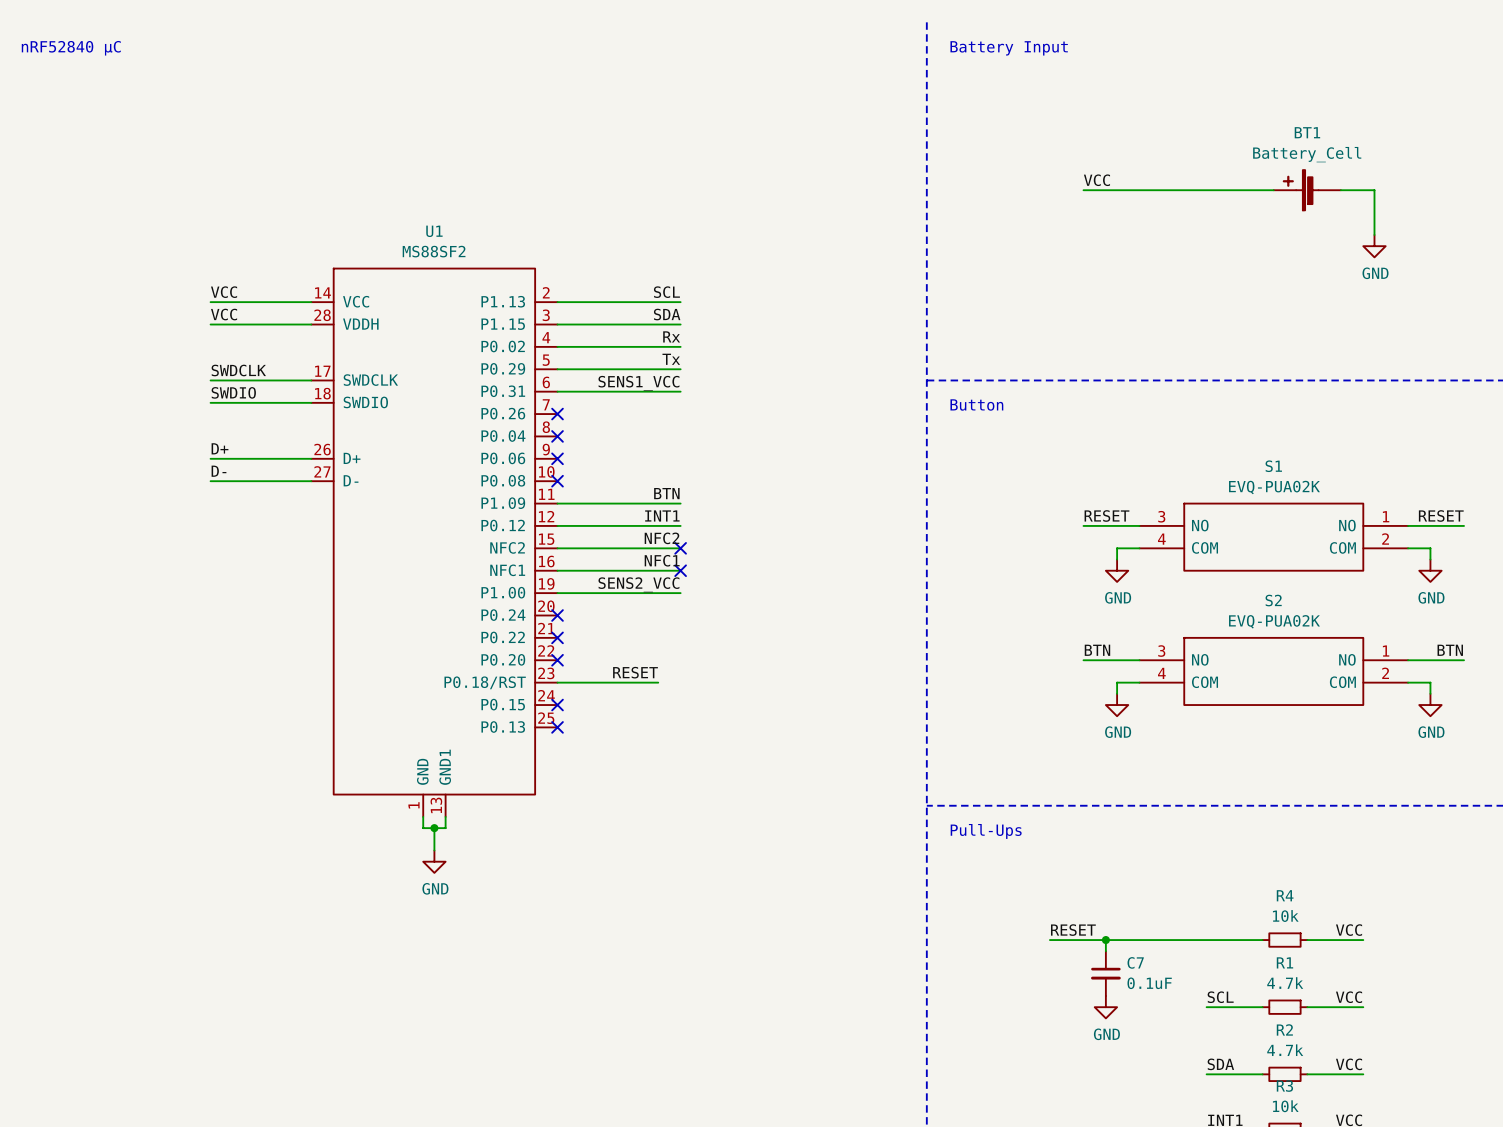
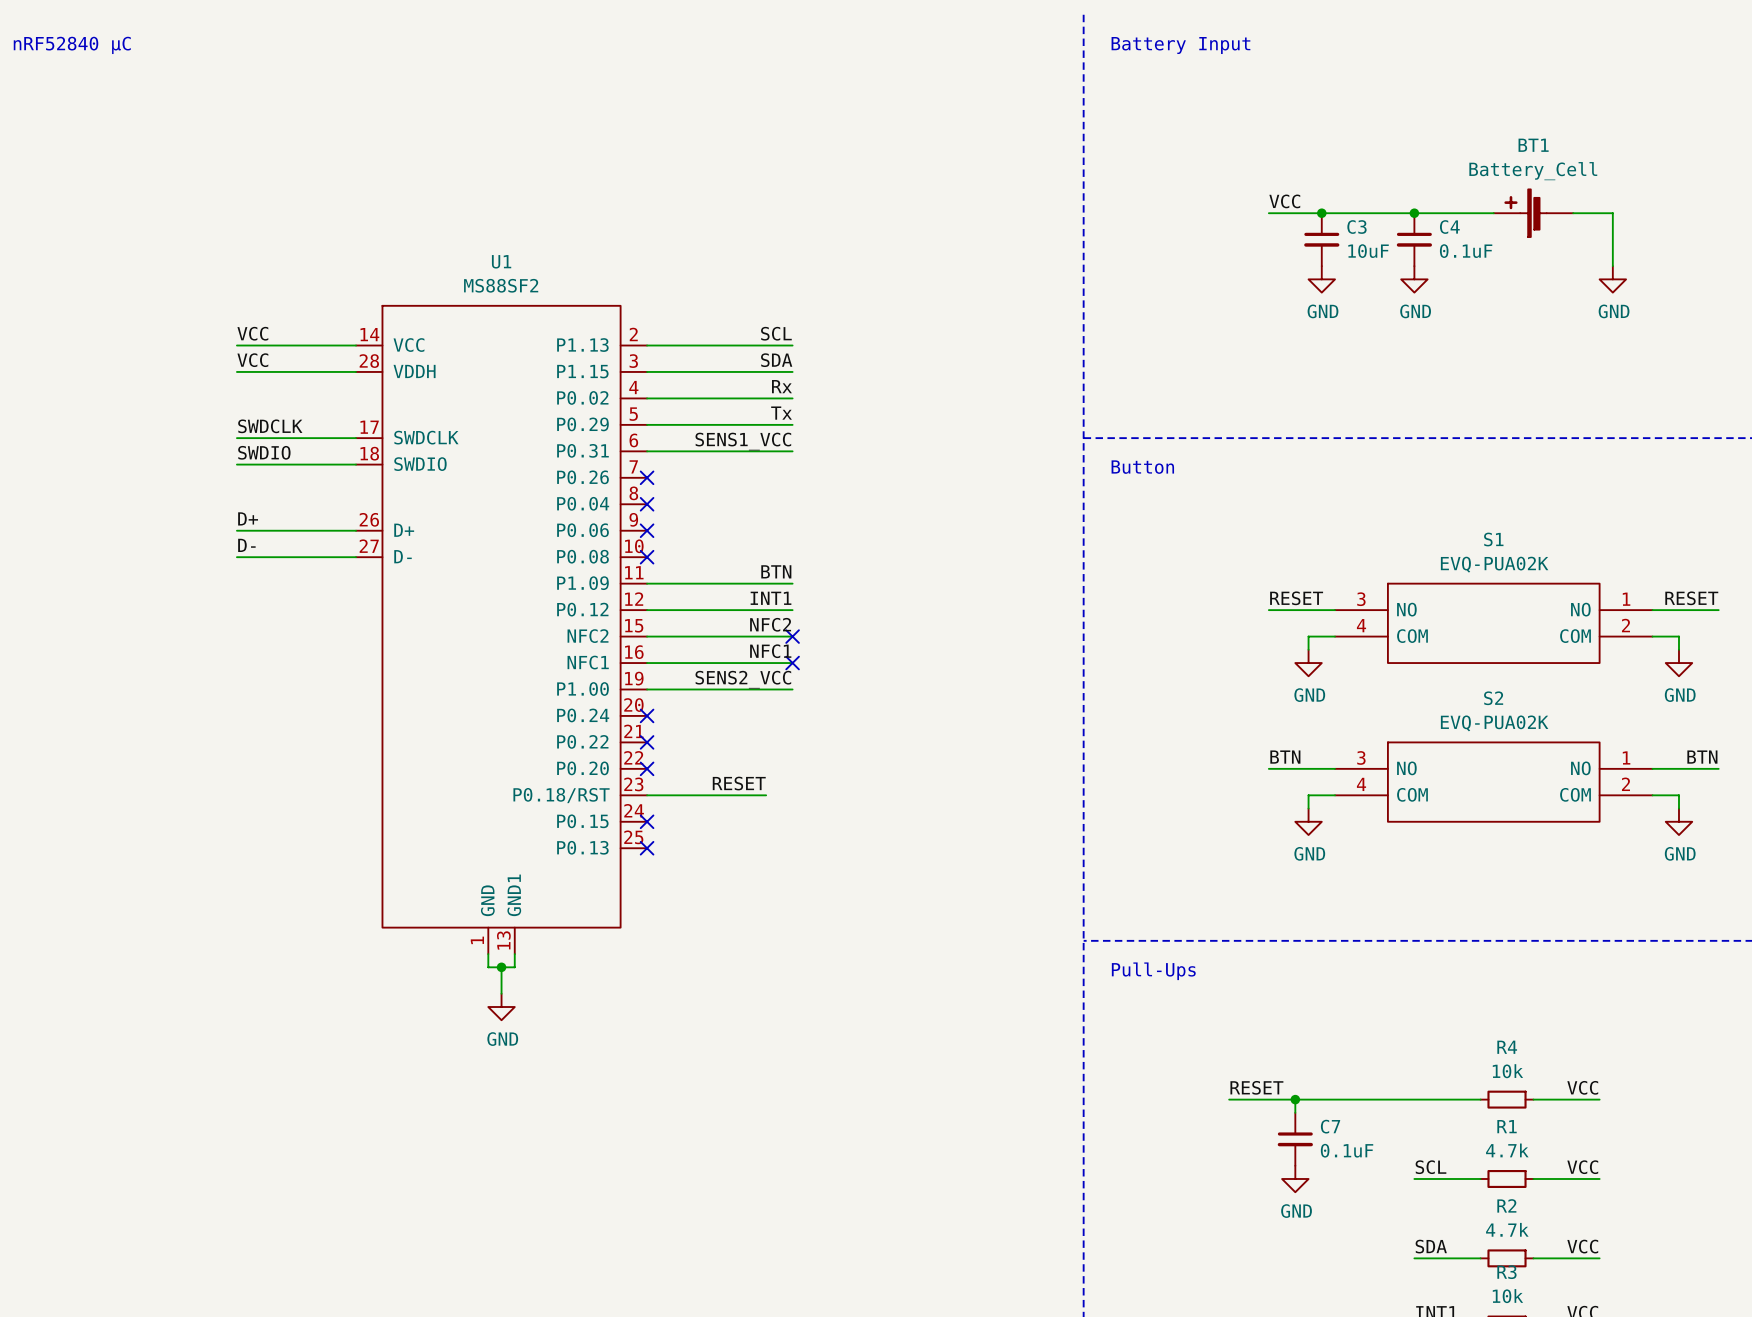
junction: none -> (1321, 213)
junction: none -> (1414, 213)
C3: none -> 10uF (1321, 239)
C4: none -> 0.1uF (1414, 239)
power symbol: none -> GND (1321, 279)
power symbol: none -> GND (1414, 279)

